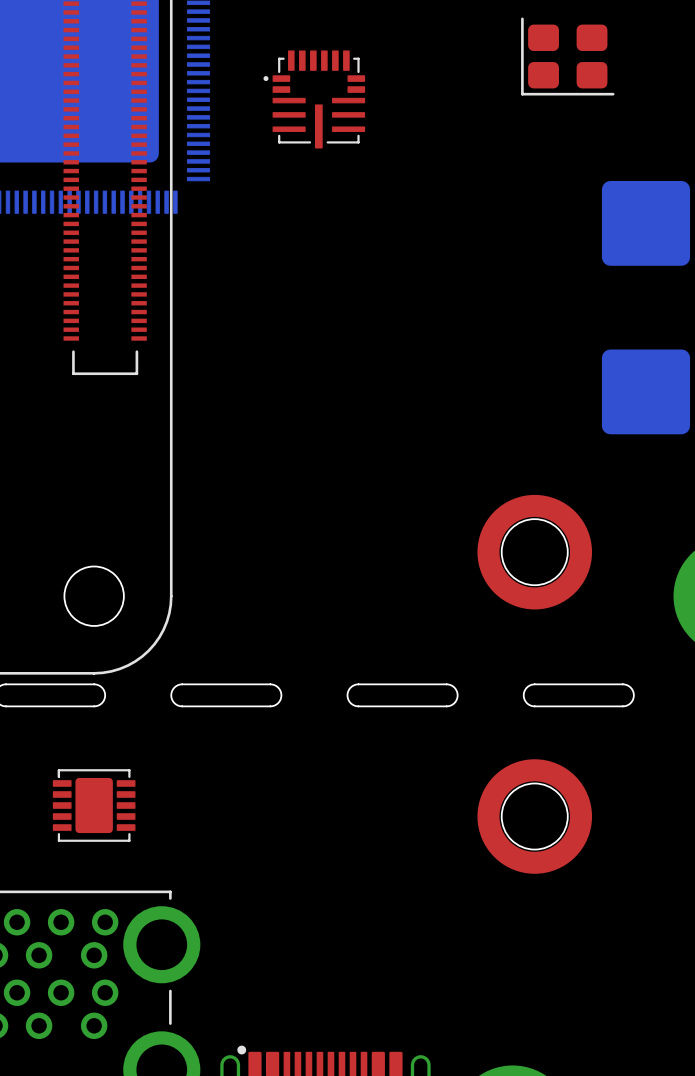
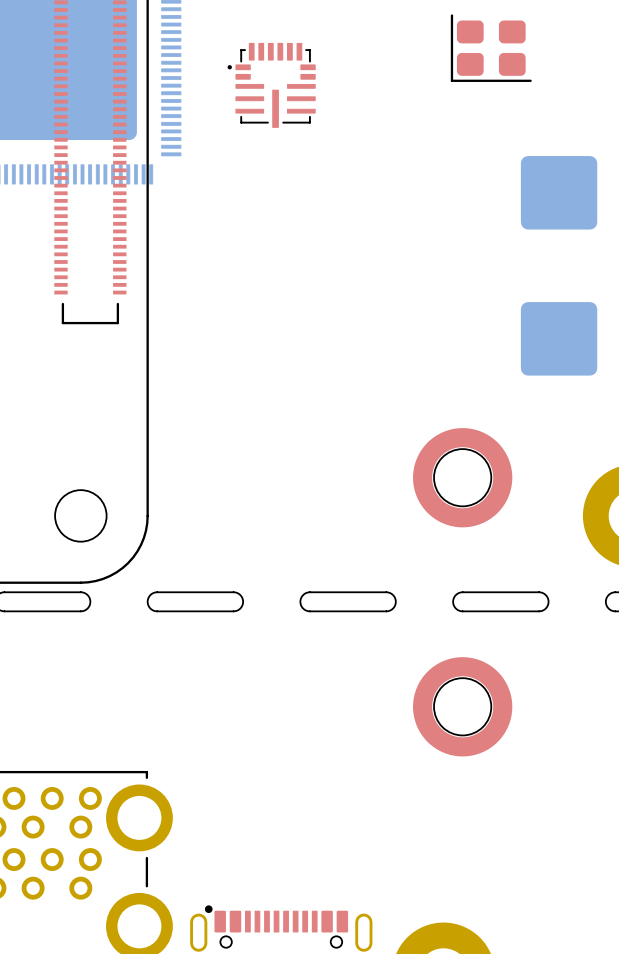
part: (89, 805) -> none

